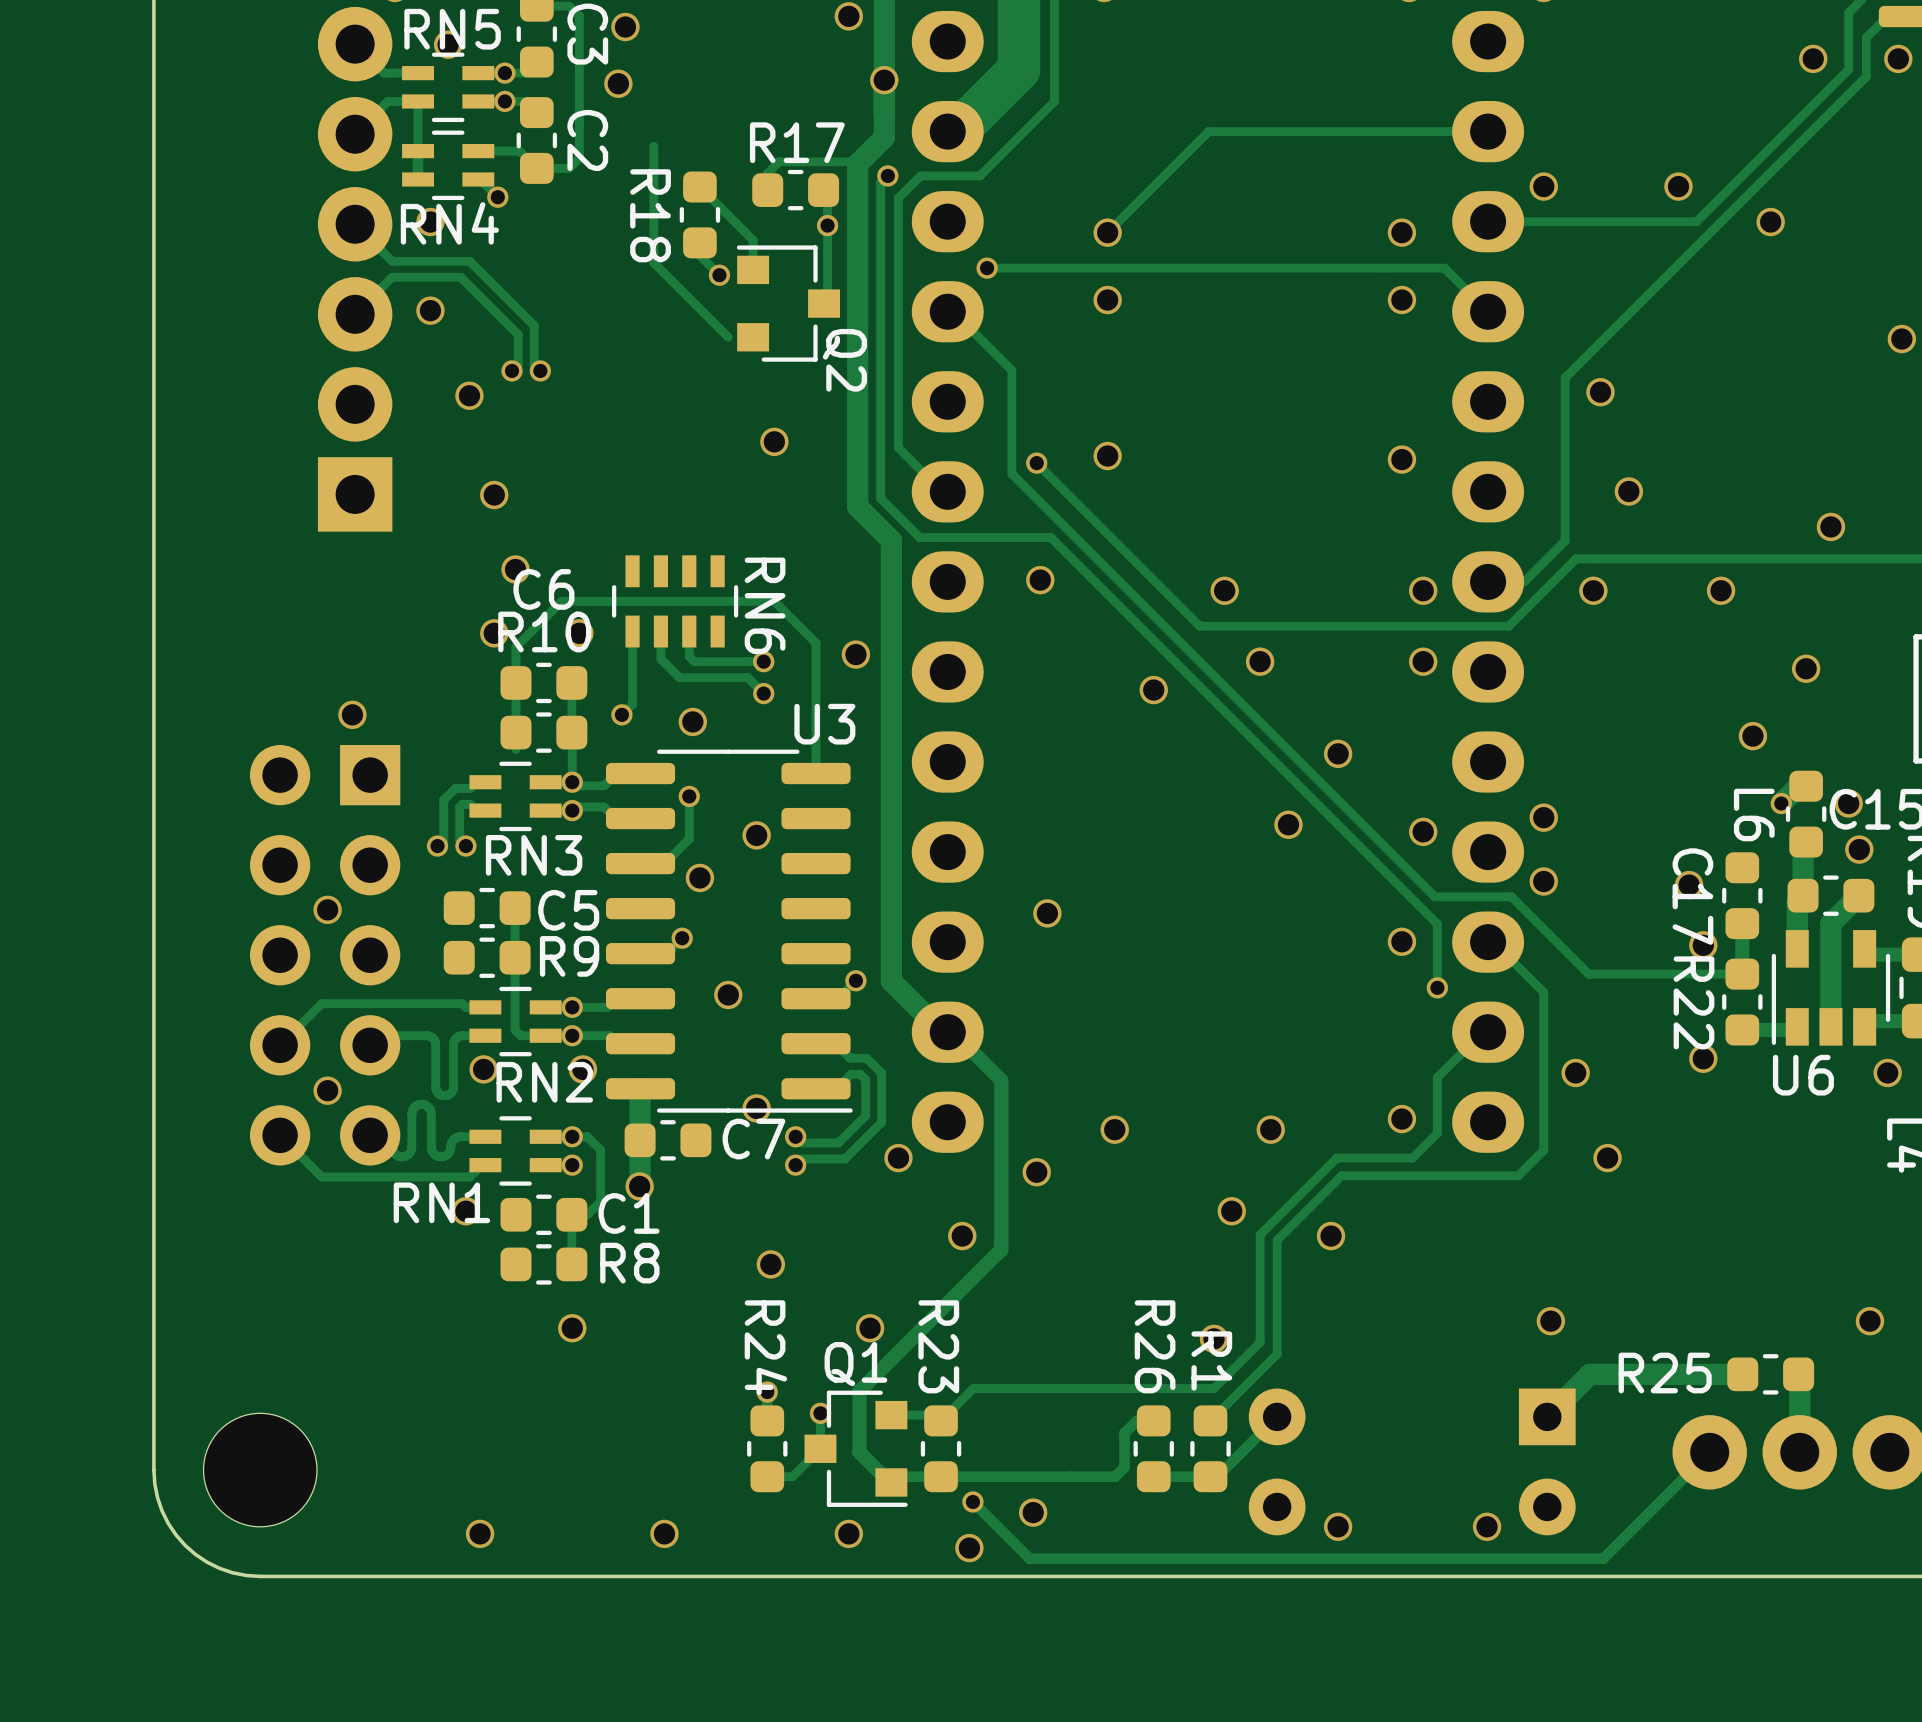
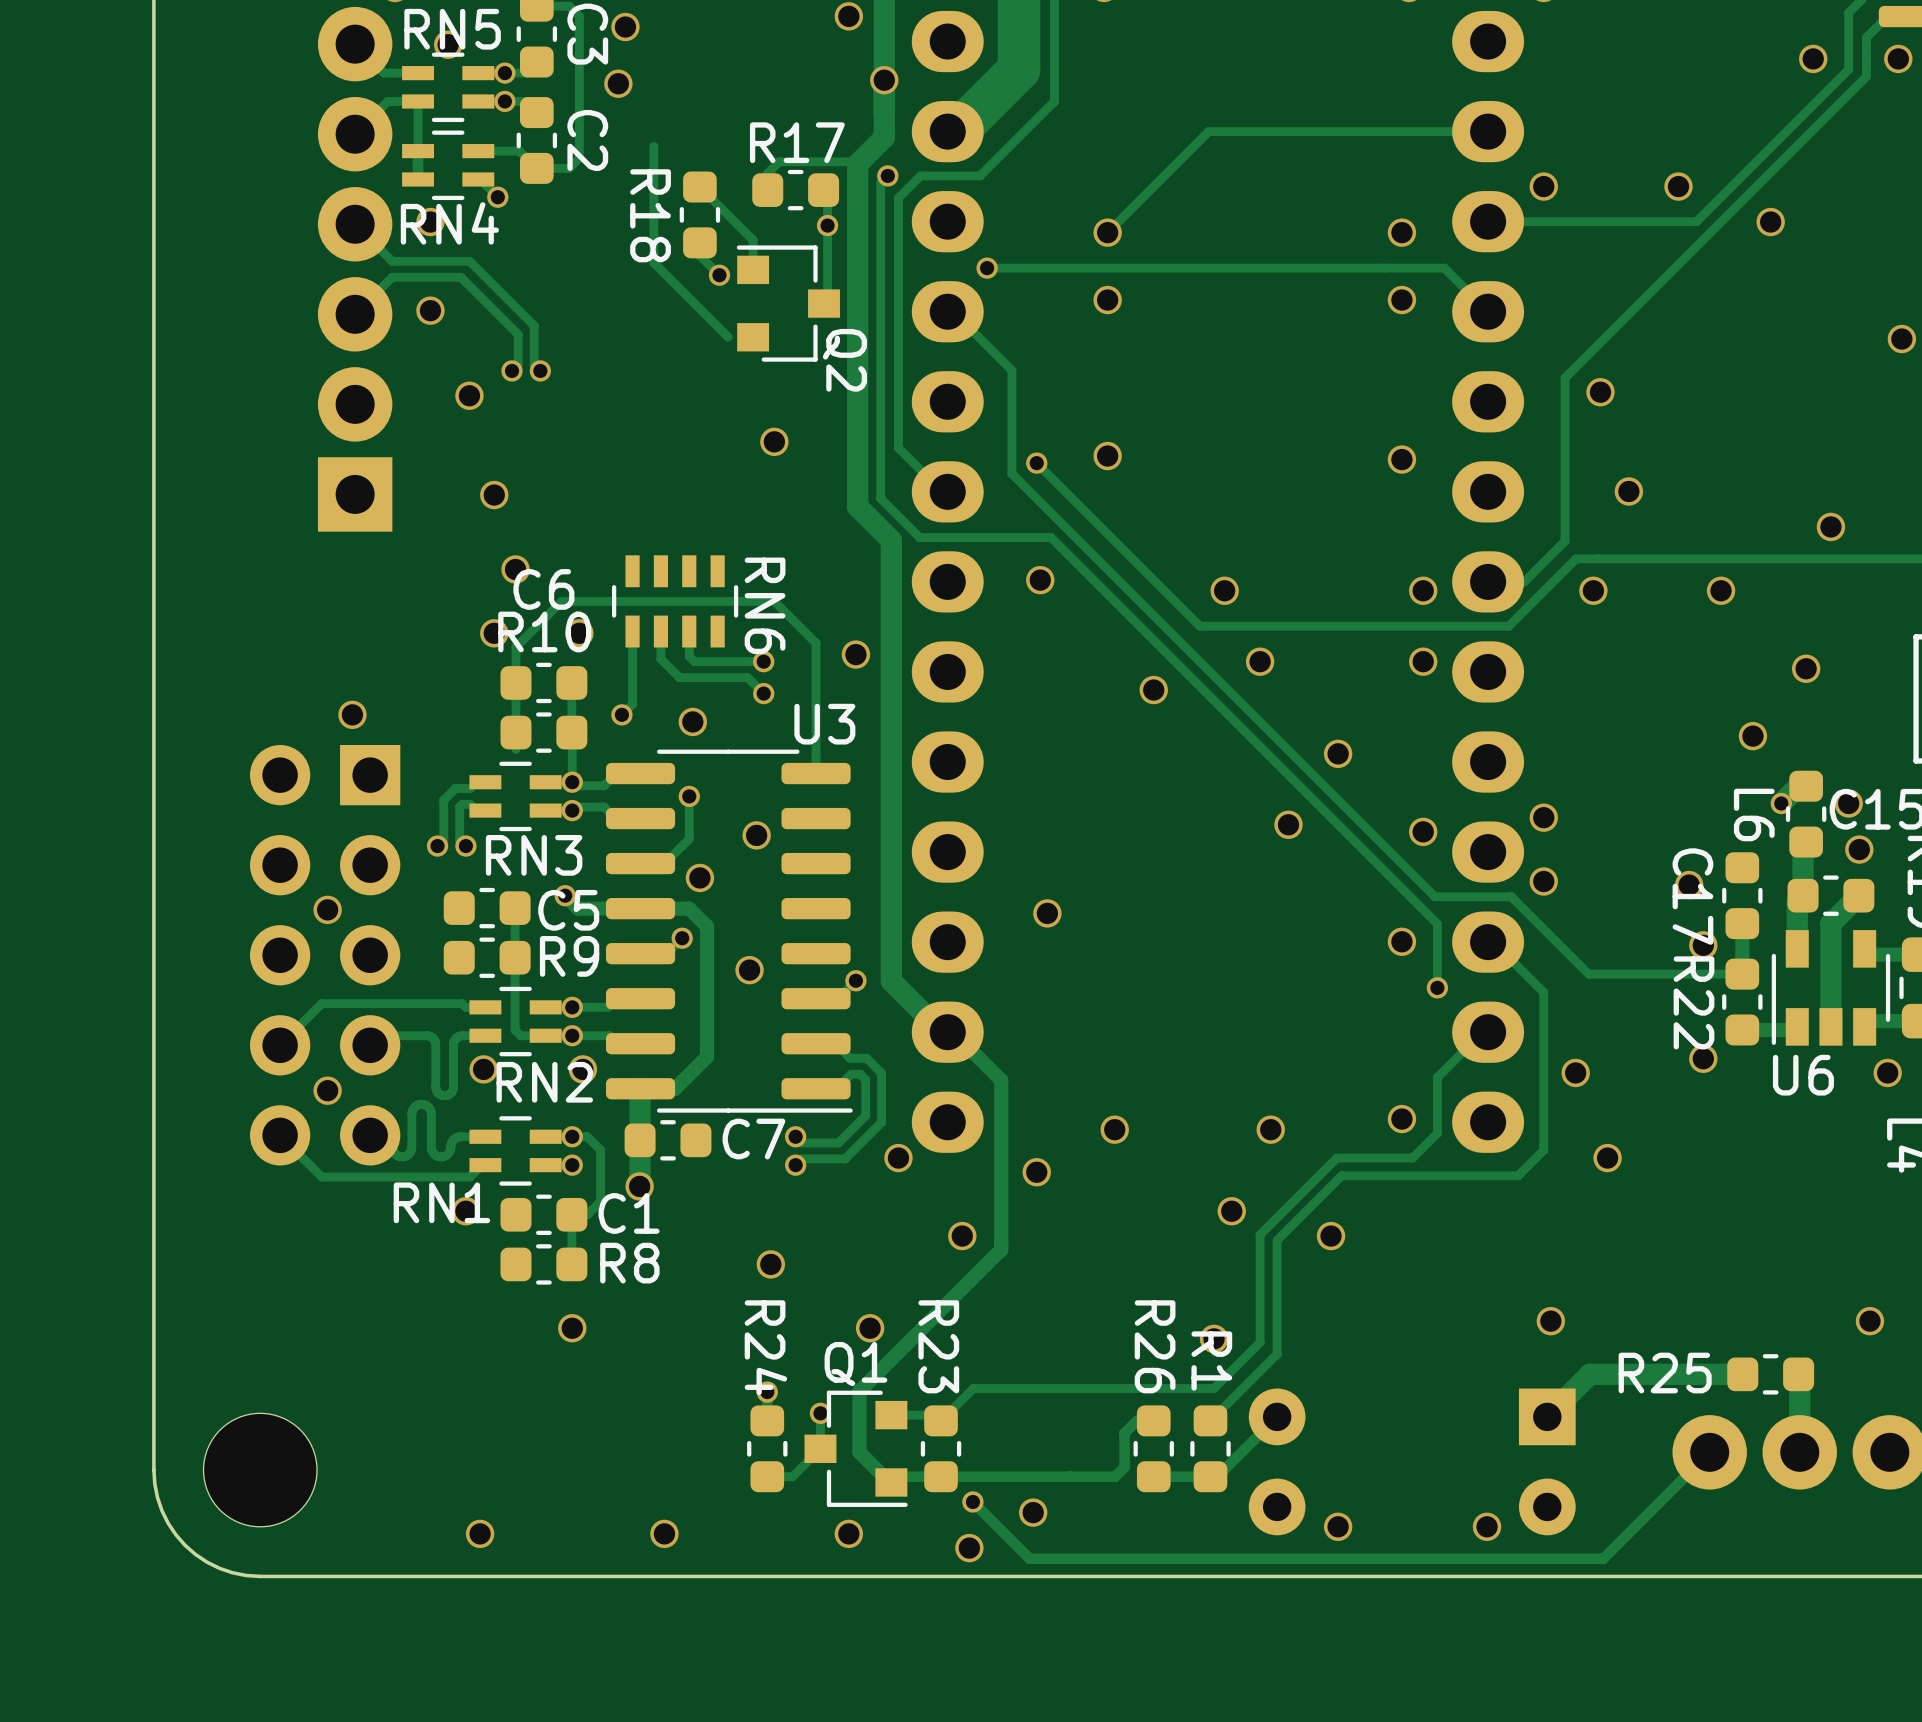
track: none -> (565, 895) (578, 908) (689, 908) (707, 926) (707, 1056) (675, 1088) (640, 1088)
via: none -> (565, 895)
via position: (728, 994) -> (749, 970)
via: (756, 1108) -> none

